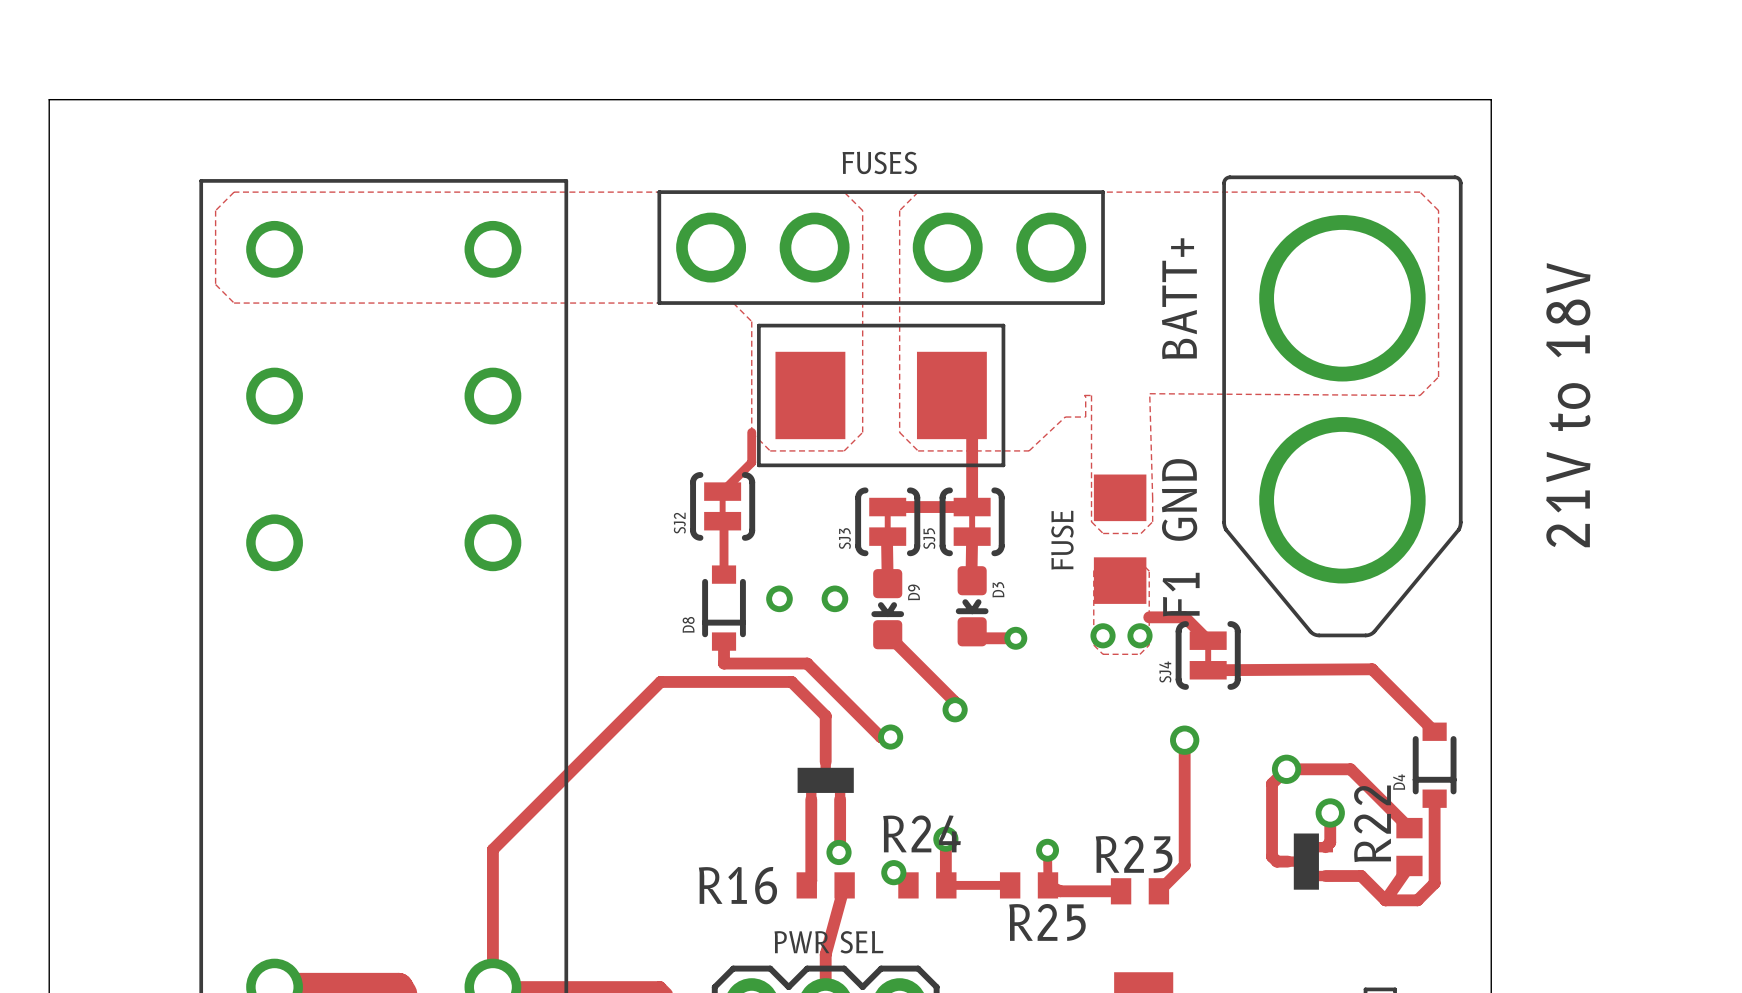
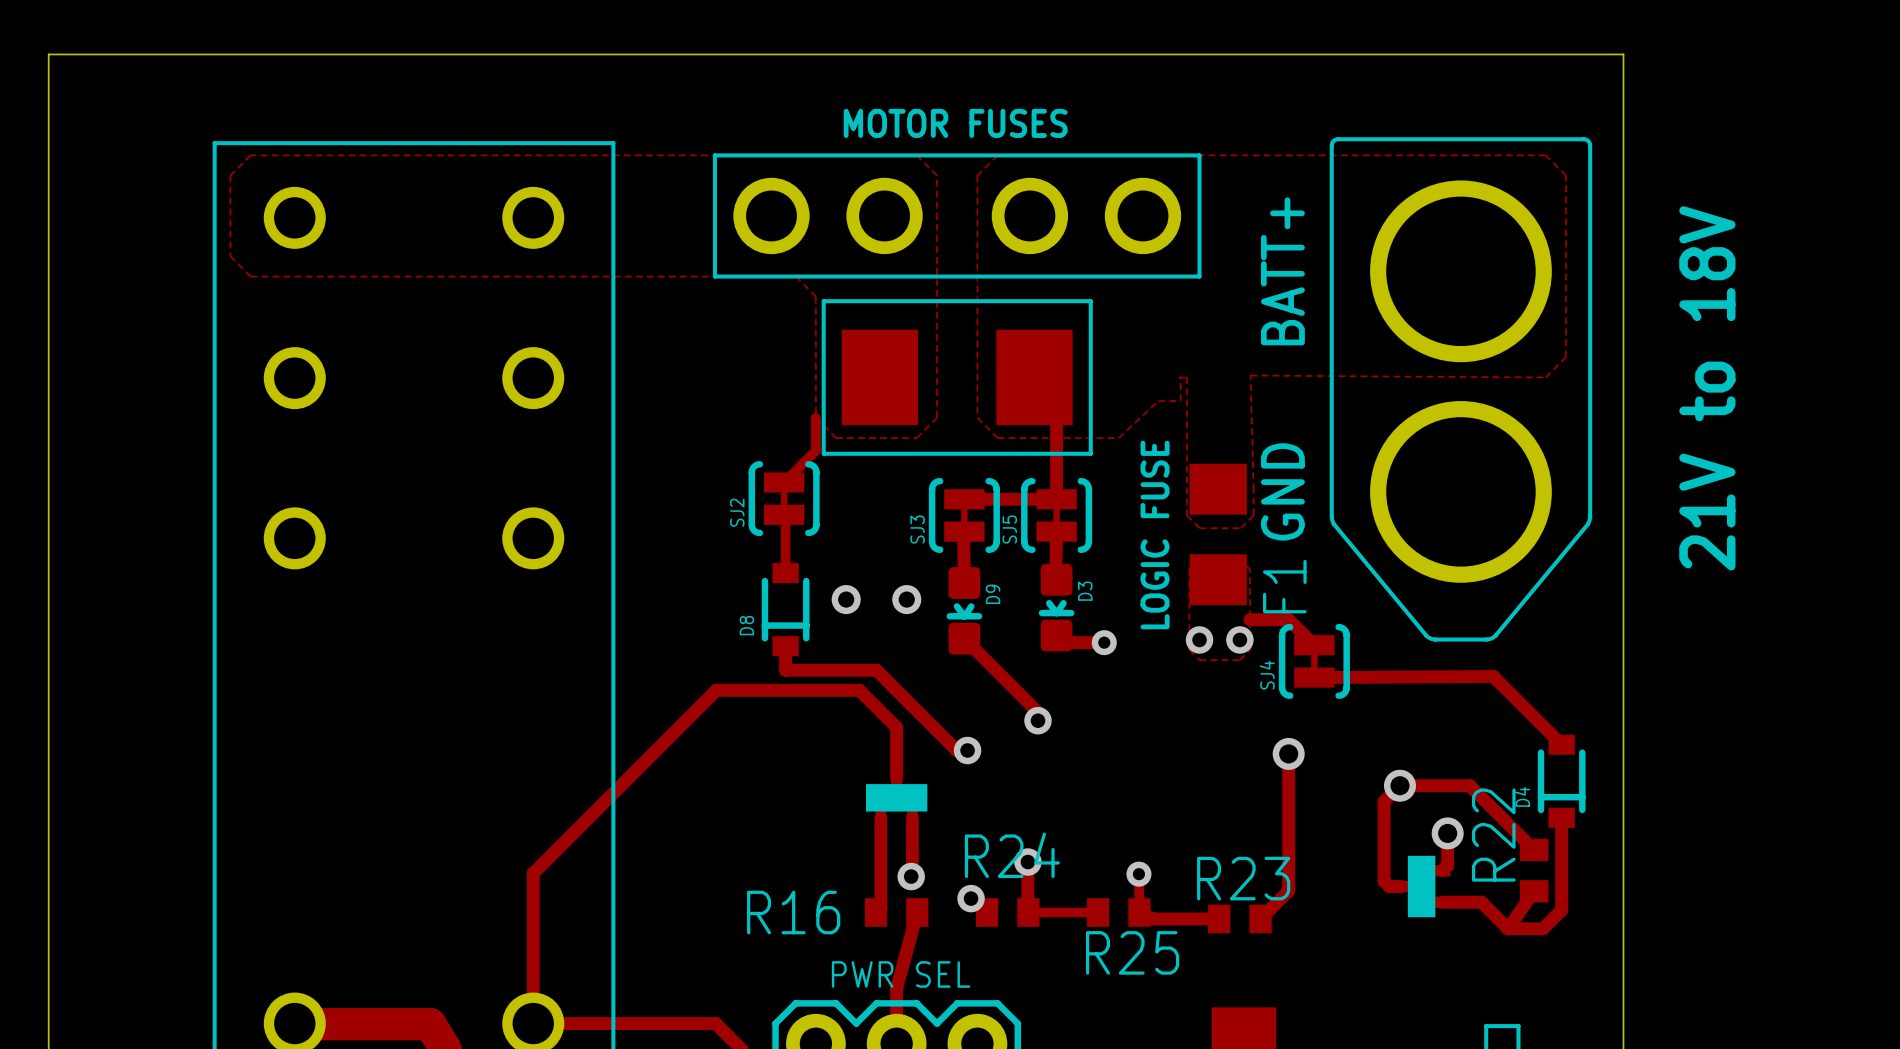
text: FUSES (879, 162) -> MOTOR FUSES (955, 123)
text: FUSE (1062, 540) -> LOGIC FUSE (1155, 534)

